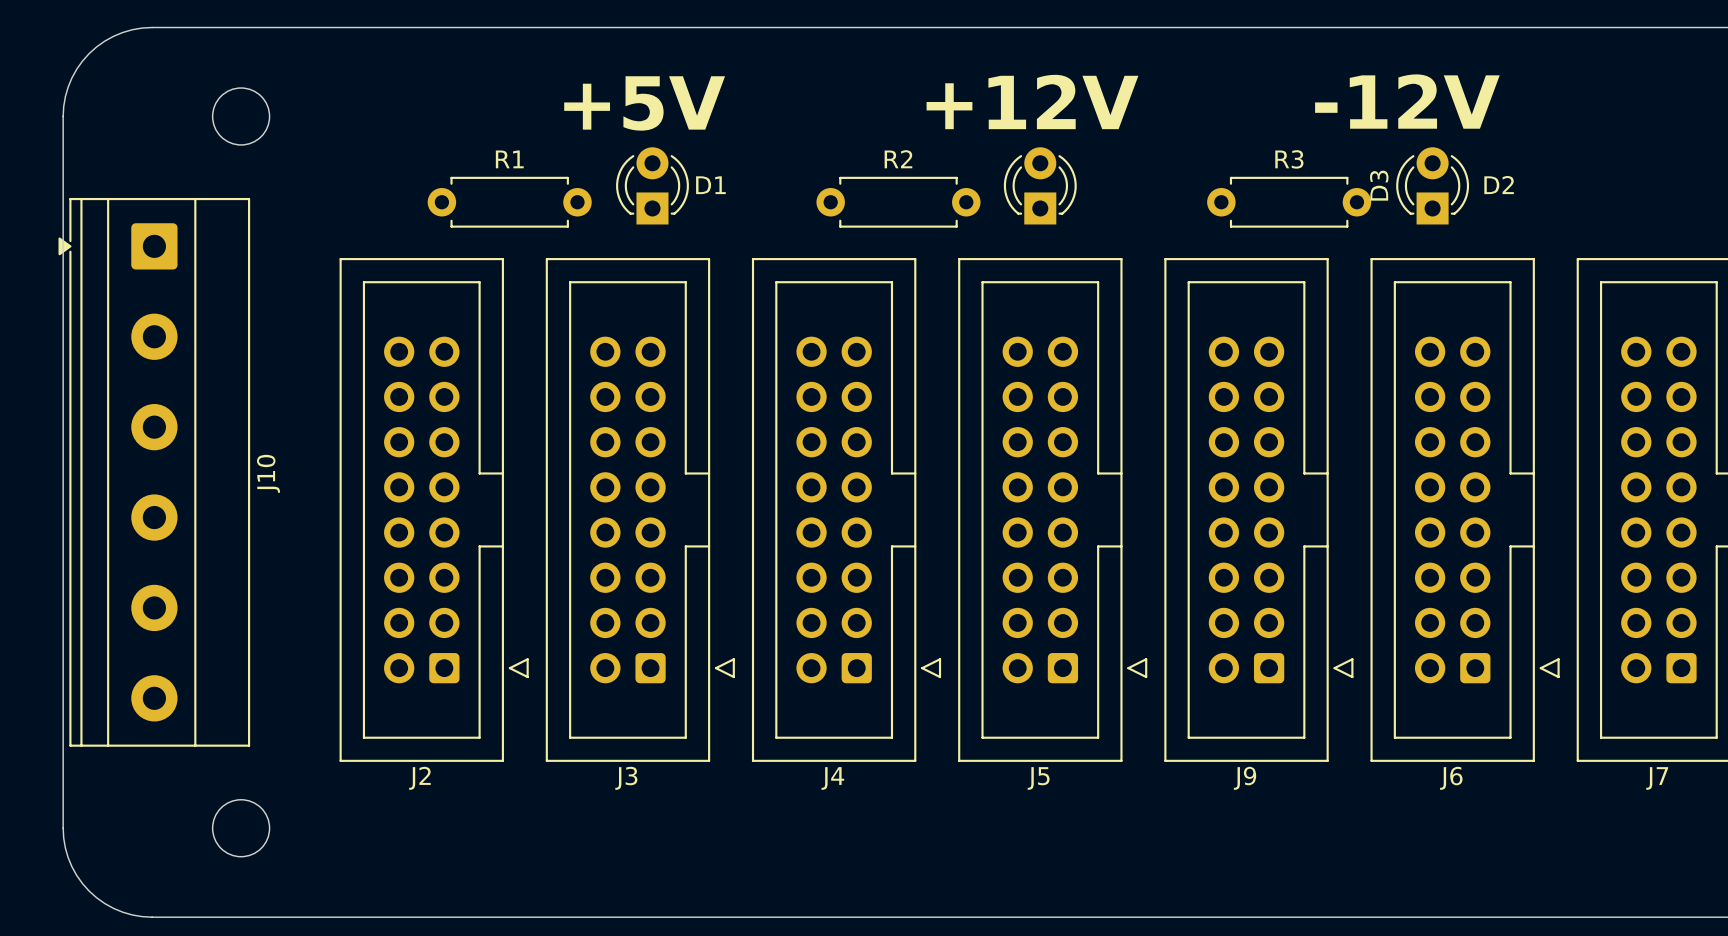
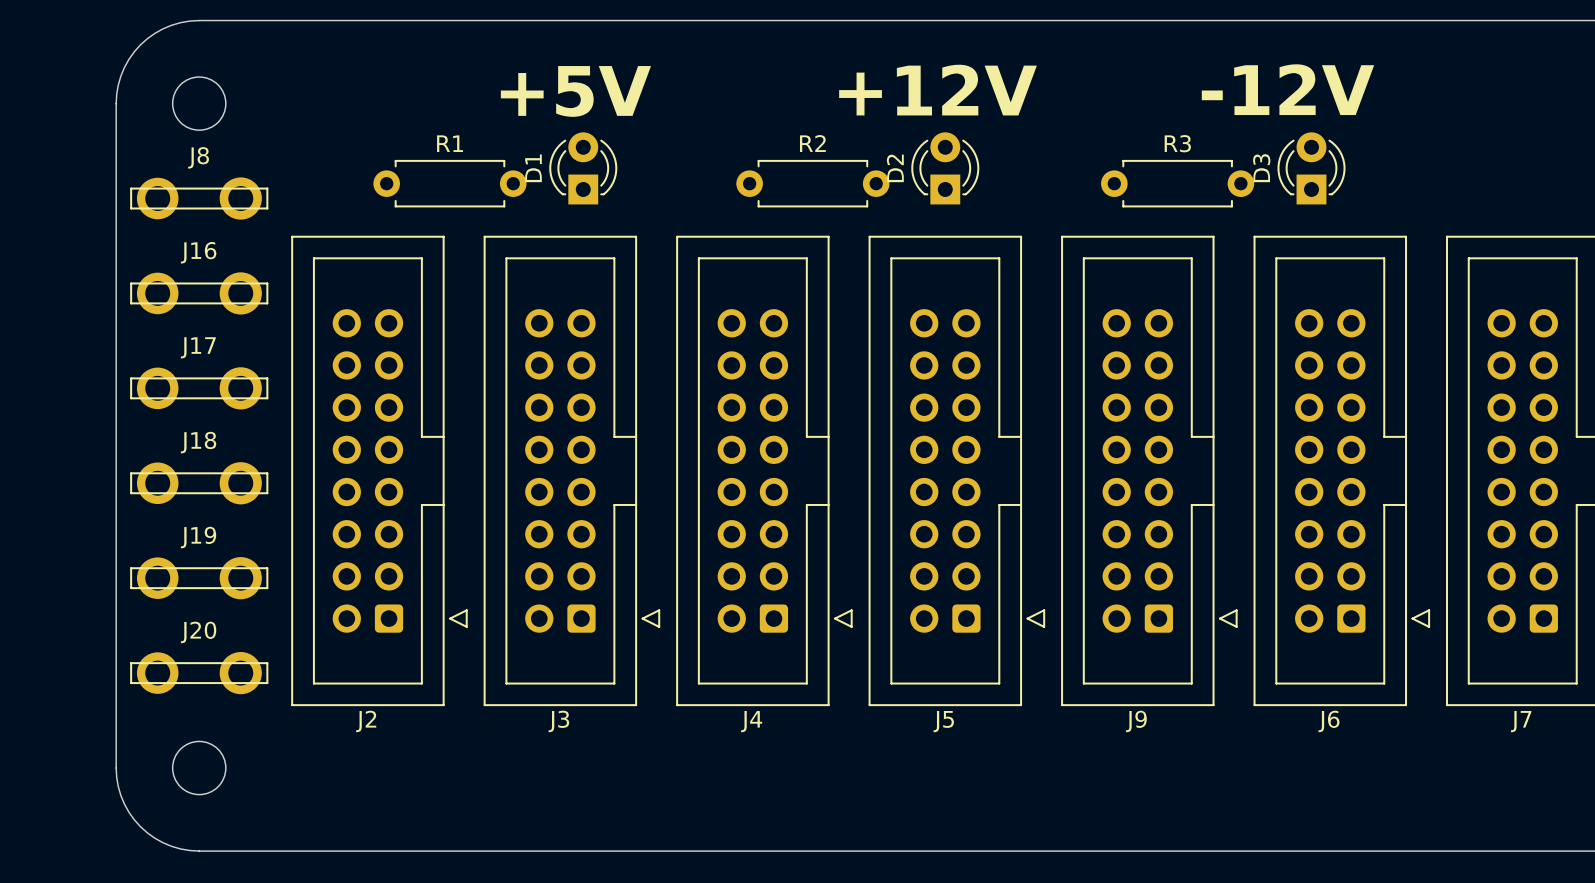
board edge: (241, 27) (142, 28) (113, 36) (96, 46) (76, 69) (68, 87) (63, 116) (63, 828) (65, 848) (76, 875) (89, 891) (104, 903) (122, 912) (152, 917) (241, 917) -> (199, 20) (180, 22) (163, 28) (140, 44) (124, 67) (118, 85) (116, 103) (116, 777) (124, 804) (140, 826) (155, 838) (171, 846) (199, 851)
D1 name rotation: 0° (710, 185) -> 90° counterclockwise (533, 168)
D1 name position: D1 (710, 185) -> D1 (533, 168)
D2 name rotation: 0° (1499, 185) -> 90° counterclockwise (895, 168)
D2 name position: D2 (1499, 185) -> D2 (895, 168)
J8: none -> (199, 198)
J16: none -> (199, 293)
J17: none -> (199, 388)
J10: (154, 472) -> none
J18: none -> (199, 483)
J19: none -> (199, 578)
J20: none -> (199, 673)

